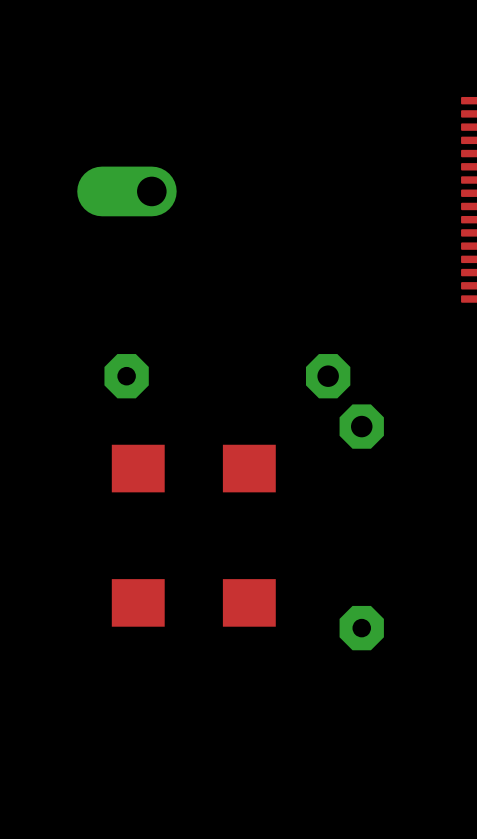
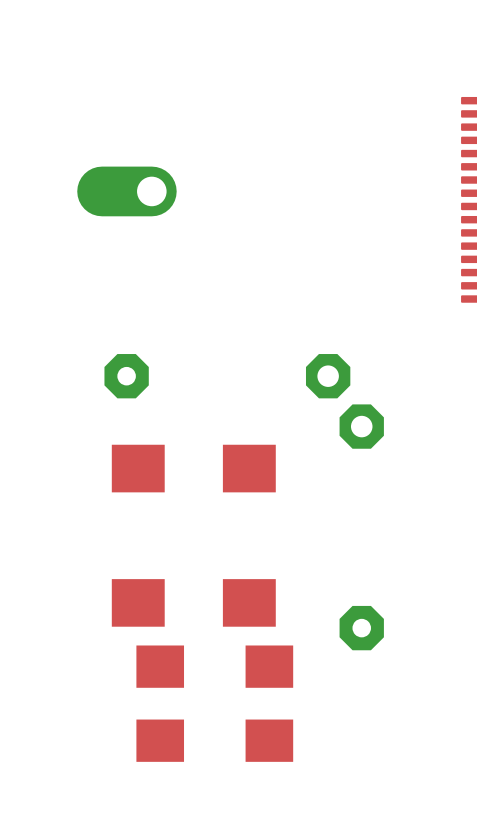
part: none -> (160, 703)
part: none -> (269, 703)

